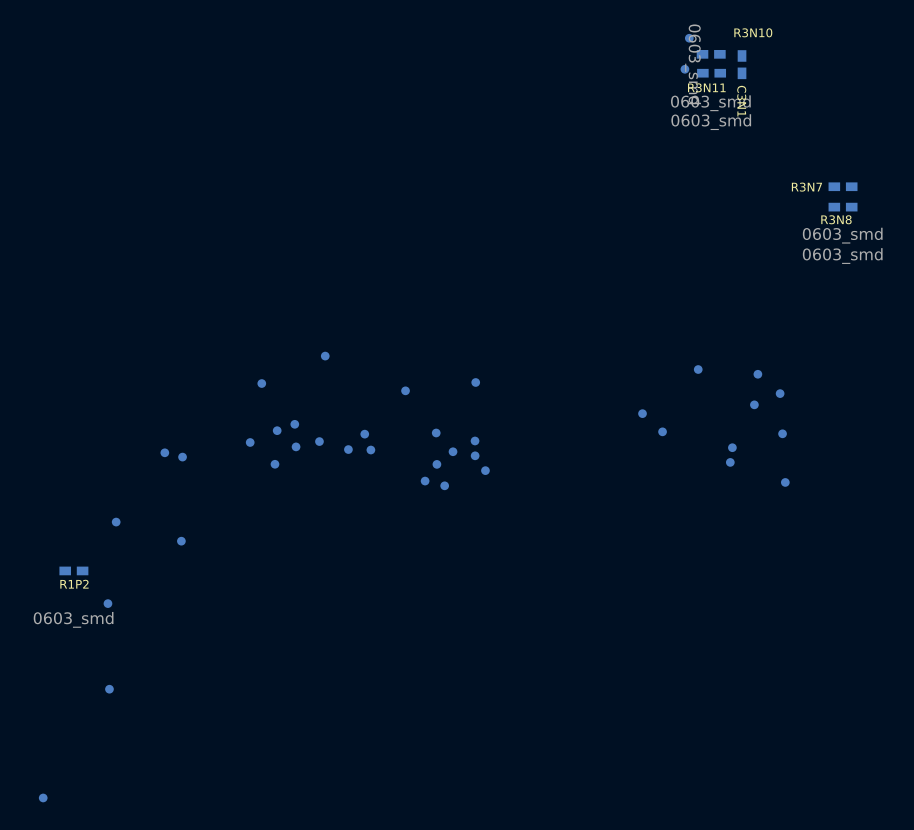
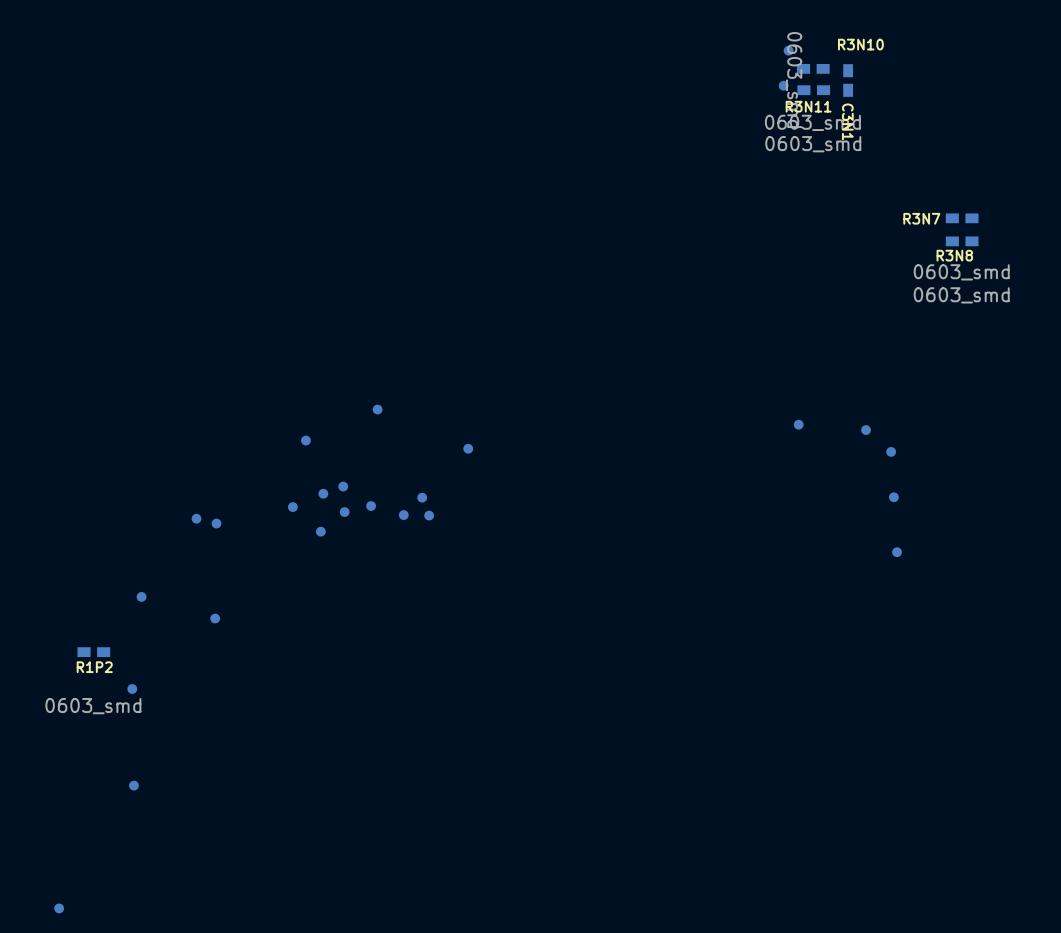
part: (475, 382) -> none
part: (754, 404) -> none
part: (642, 413) -> none
part: (662, 431) -> none
part: (436, 432) -> none
part: (475, 440) -> none
part: (732, 447) -> none
part: (453, 451) -> none
part: (475, 455) -> none
part: (730, 462) -> none
part: (436, 464) -> none
part: (485, 470) -> none
part: (425, 481) -> none
part: (444, 485) -> none

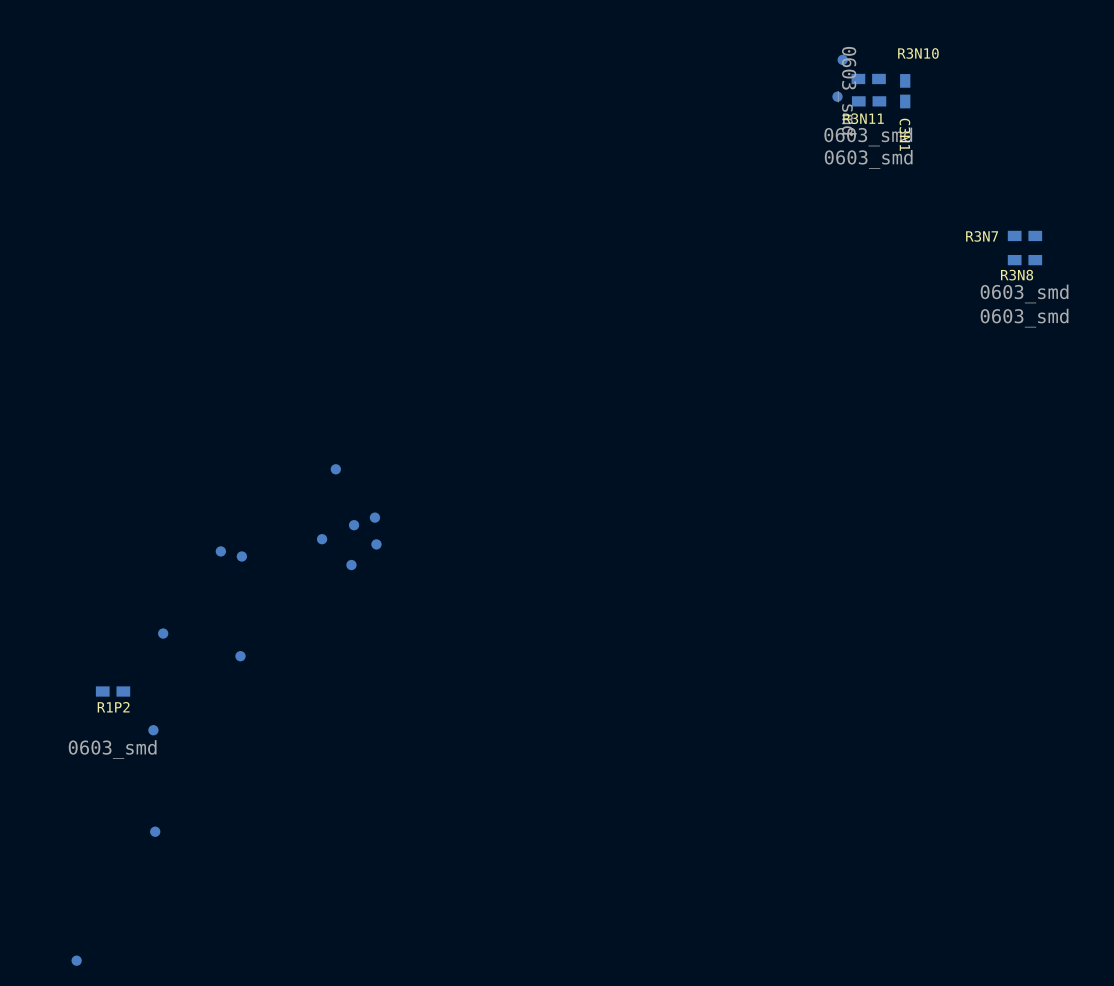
part: (377, 409) -> none
part: (798, 424) -> none
part: (866, 430) -> none
part: (468, 448) -> none
part: (891, 451) -> none
part: (422, 497) -> none
part: (893, 497) -> none
part: (371, 506) -> none
part: (403, 515) -> none
part: (429, 515) -> none
part: (897, 552) -> none

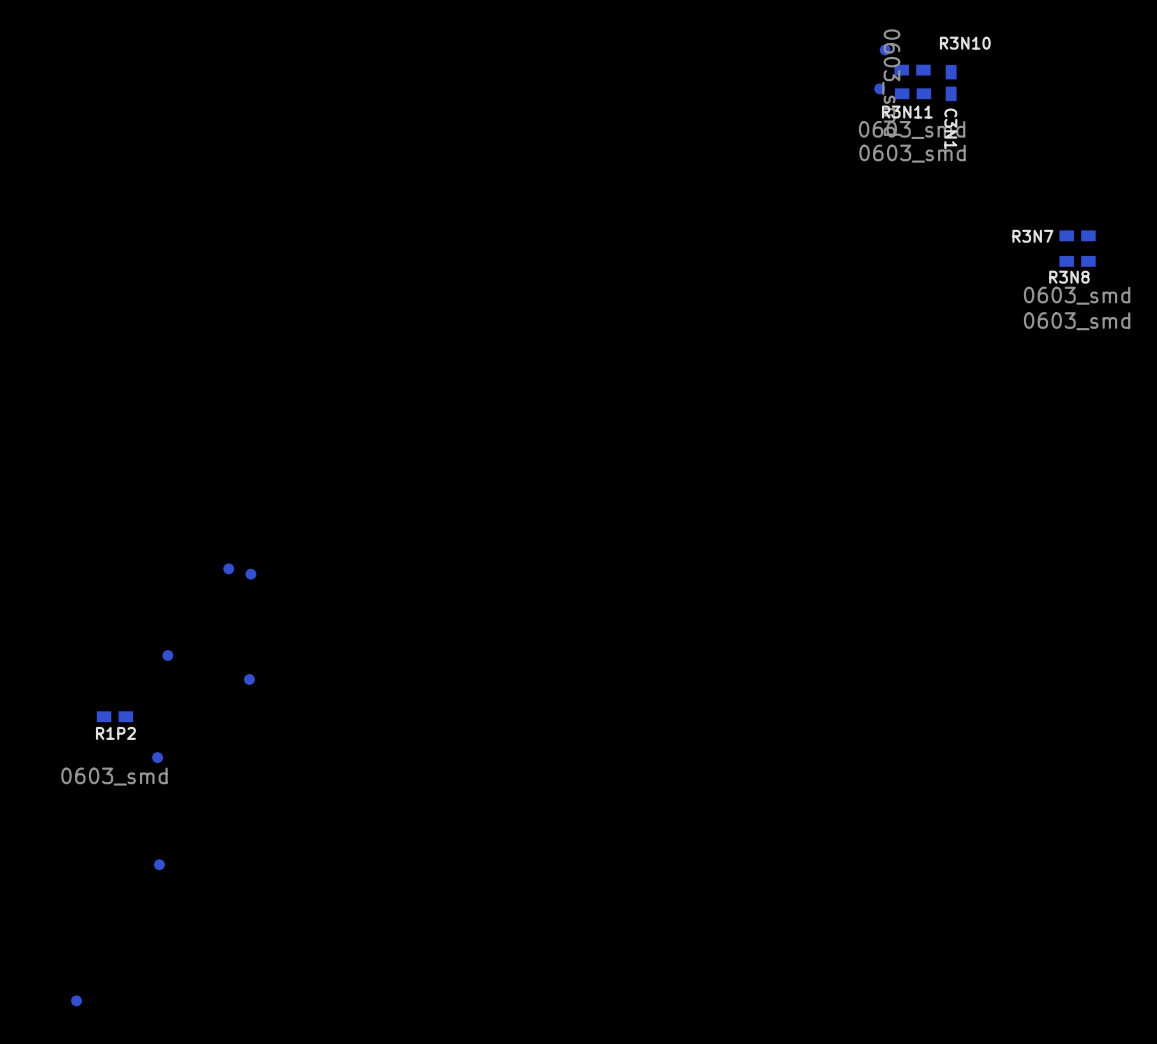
part: (335, 469) -> none
part: (374, 517) -> none
part: (354, 525) -> none
part: (322, 539) -> none
part: (376, 544) -> none
part: (351, 565) -> none

